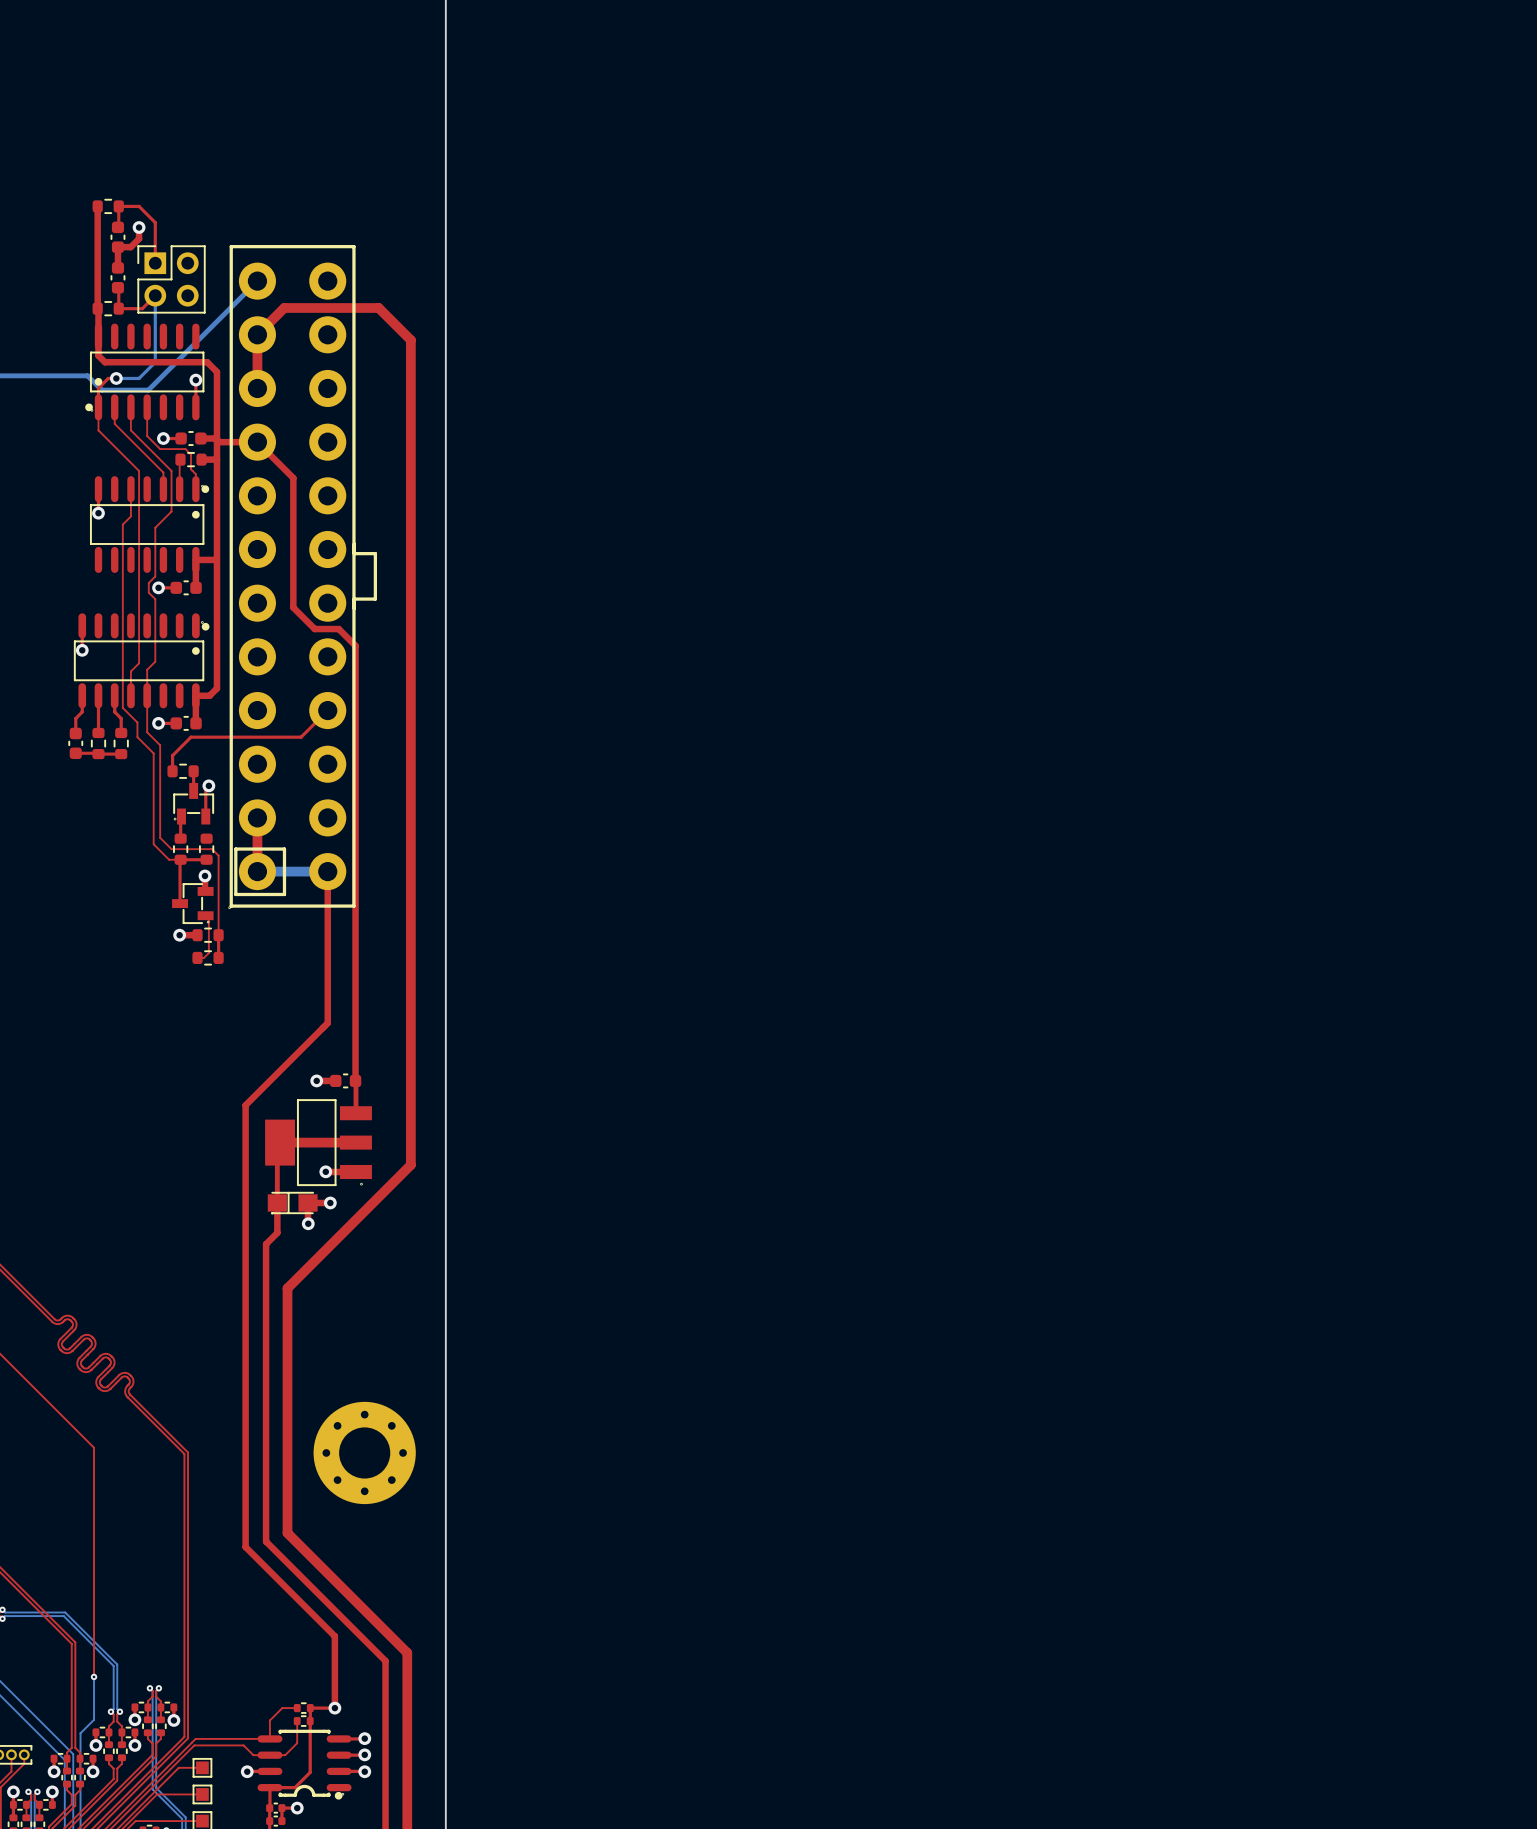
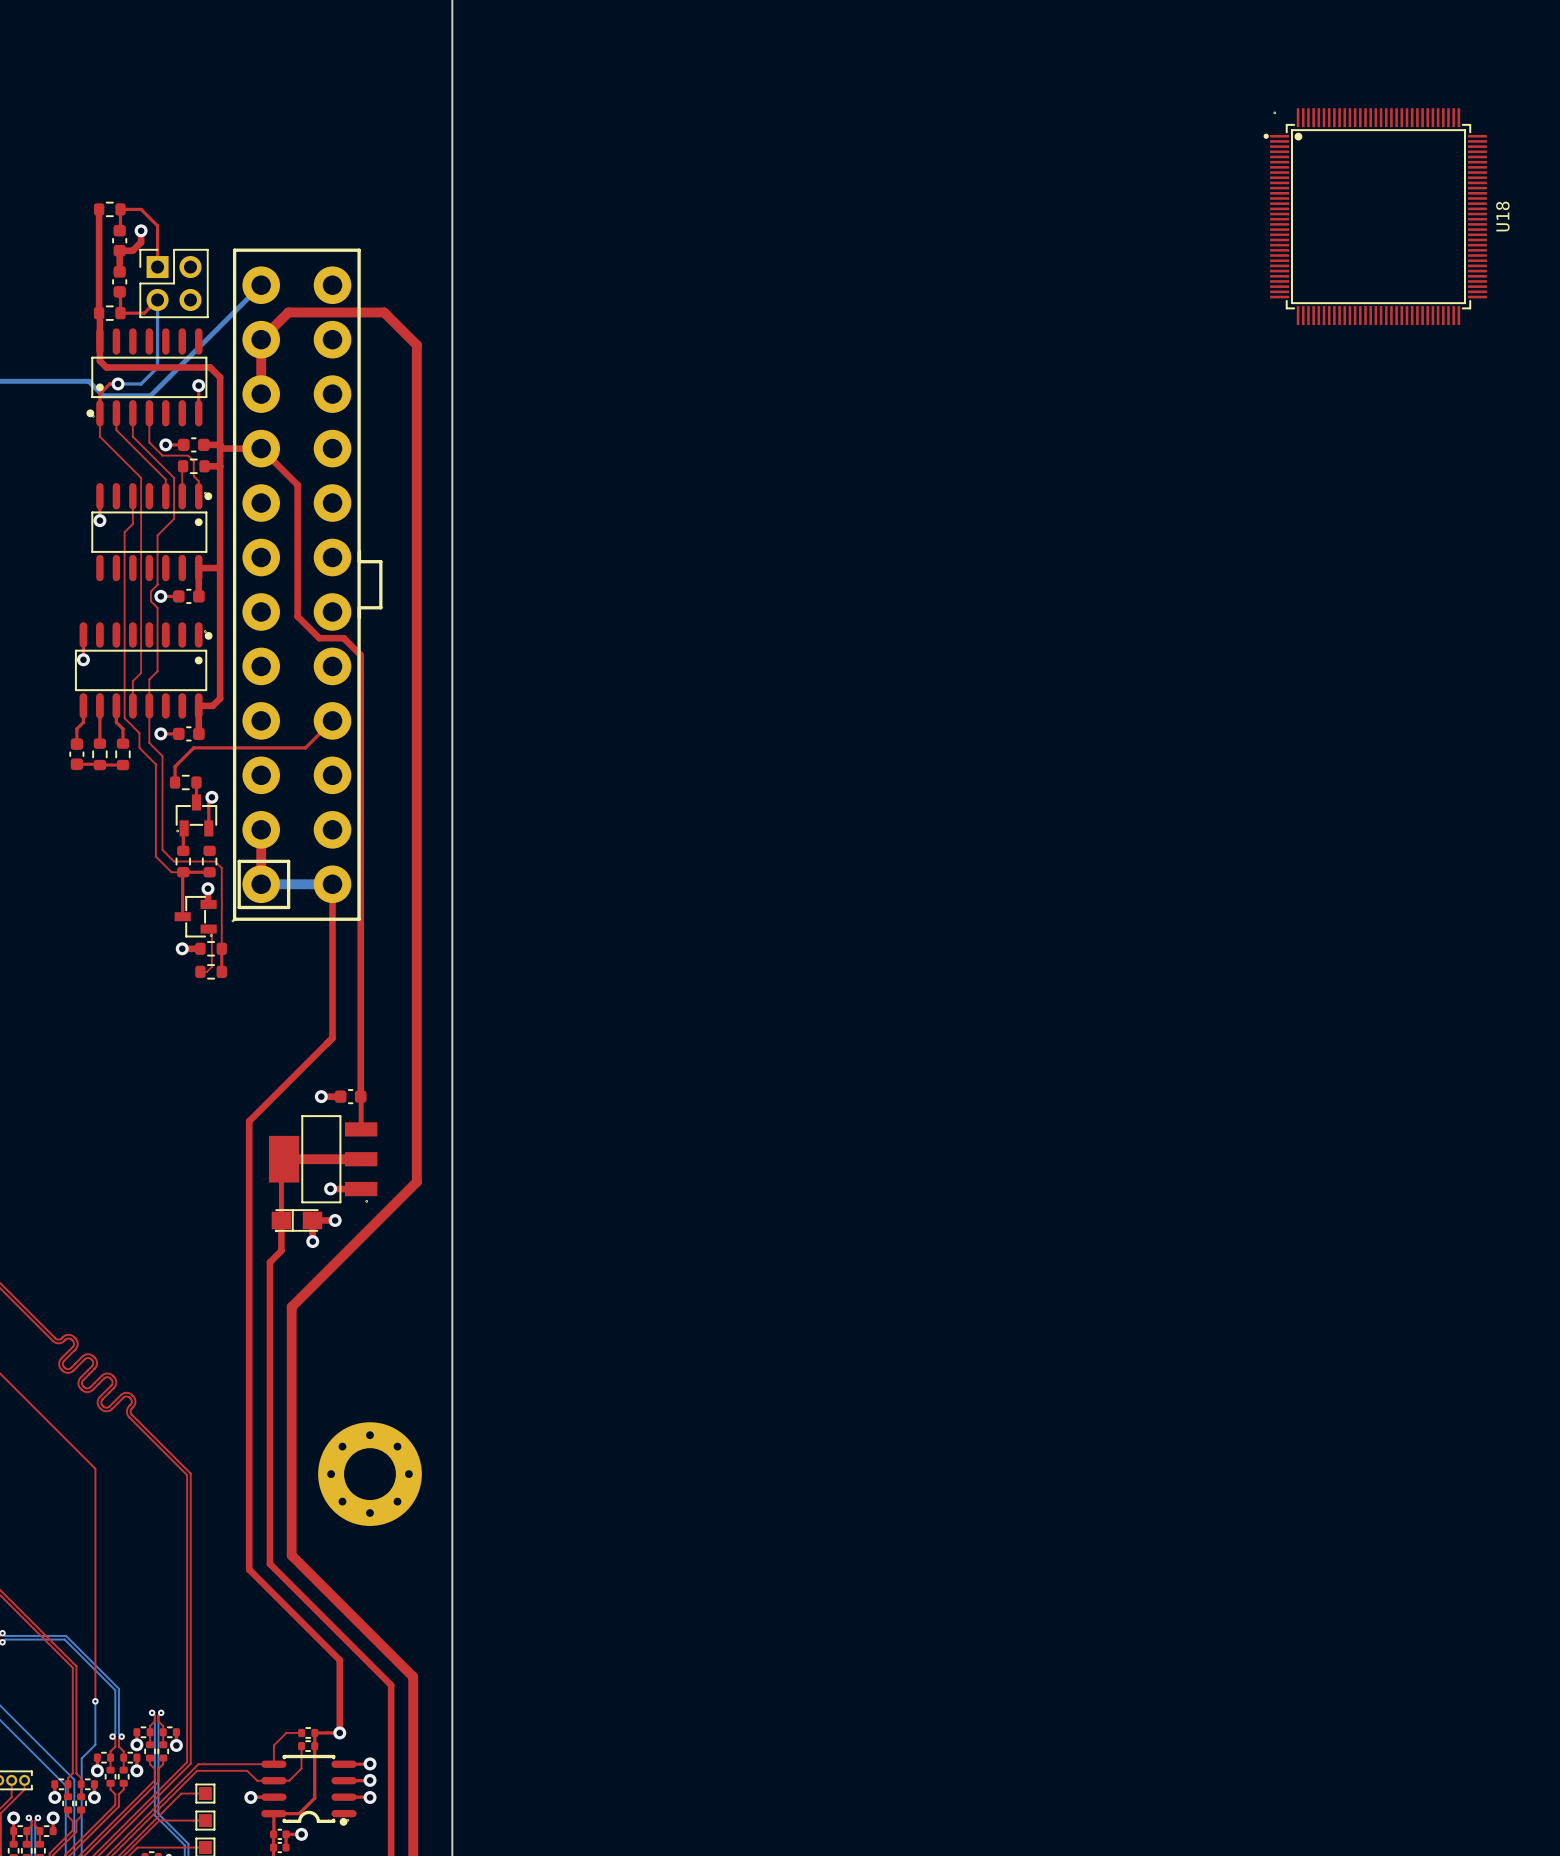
U18: none -> (1375, 216)

